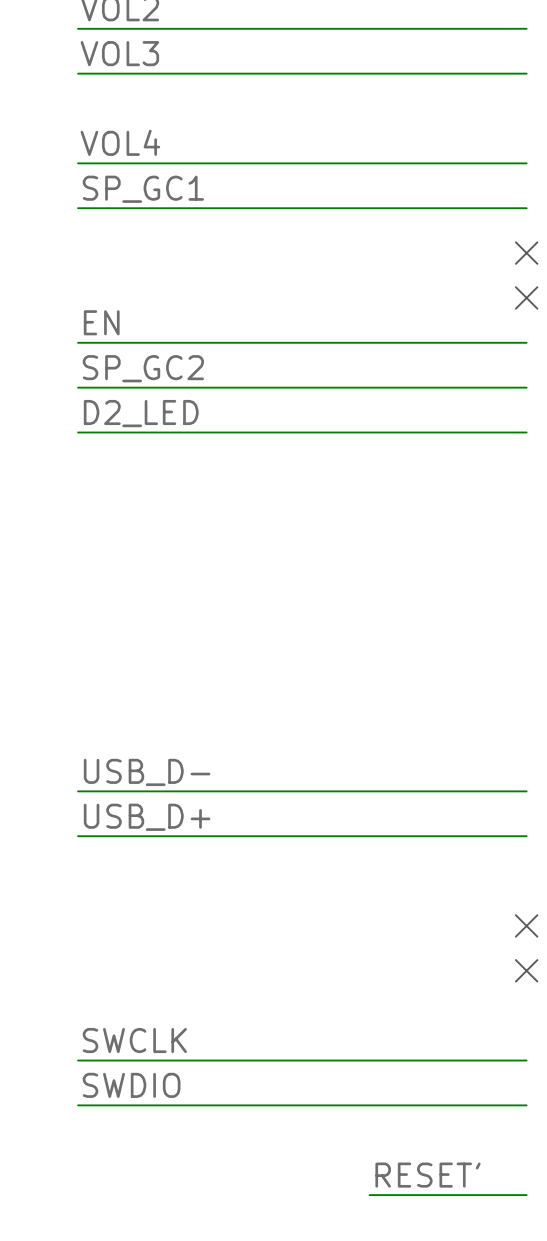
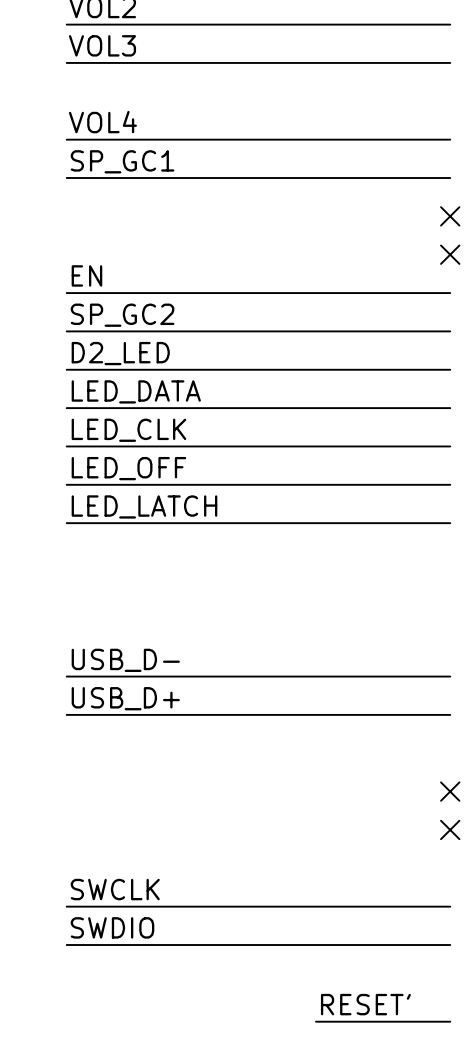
label: none -> LED_DATA (136, 391)
wire: none -> (66, 408) (450, 408)
label: none -> LED_CLK (128, 430)
wire: none -> (66, 446) (450, 446)
label: none -> LED_OFF (128, 468)
wire: none -> (66, 484) (450, 484)
label: none -> LED_LATCH (144, 506)
wire: none -> (66, 523) (450, 523)

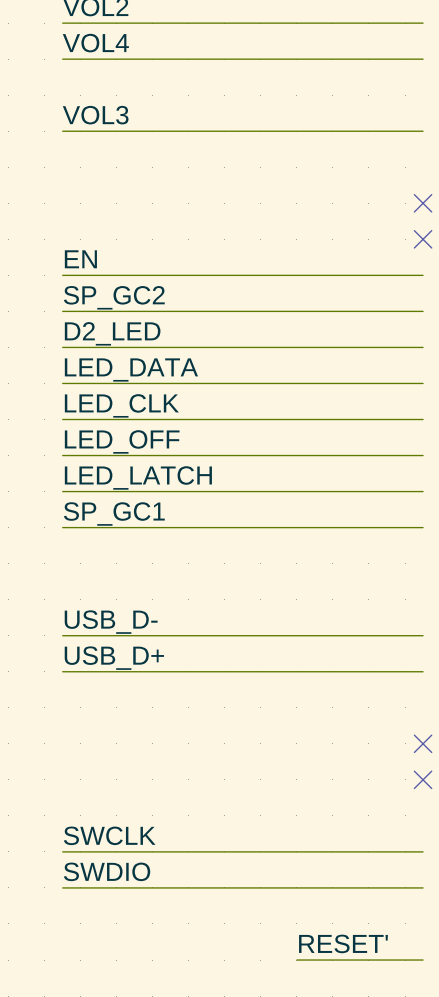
label: VOL3 (102, 45) -> VOL4 (95, 43)
label: VOL4 (102, 122) -> VOL3 (95, 115)
label: SP_GC1 (122, 161) -> none
wire: (66, 178) (450, 178) -> none
label: none -> SP_GC1 (114, 513)
wire: none -> (62, 527) (423, 527)

